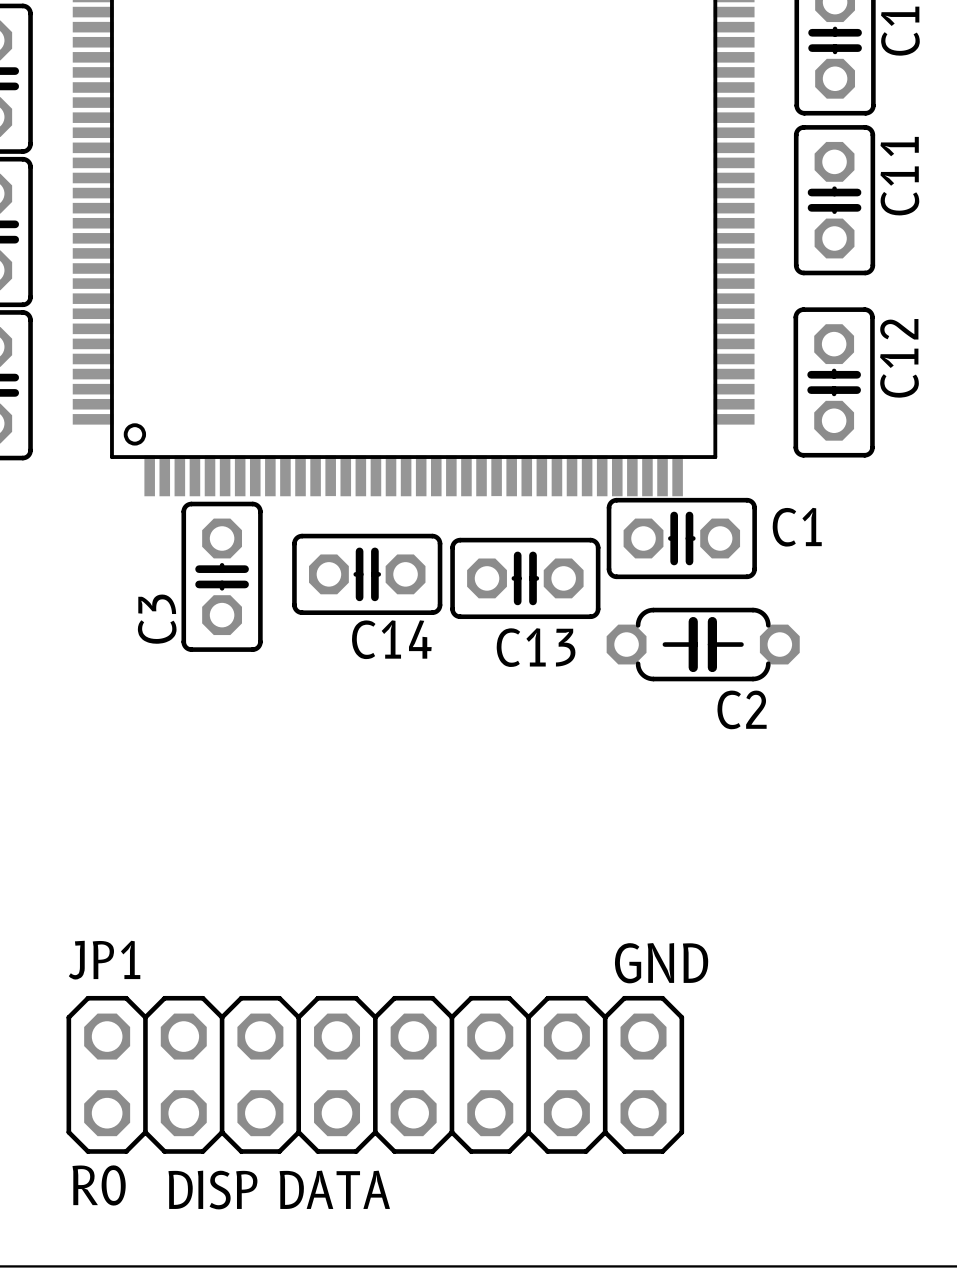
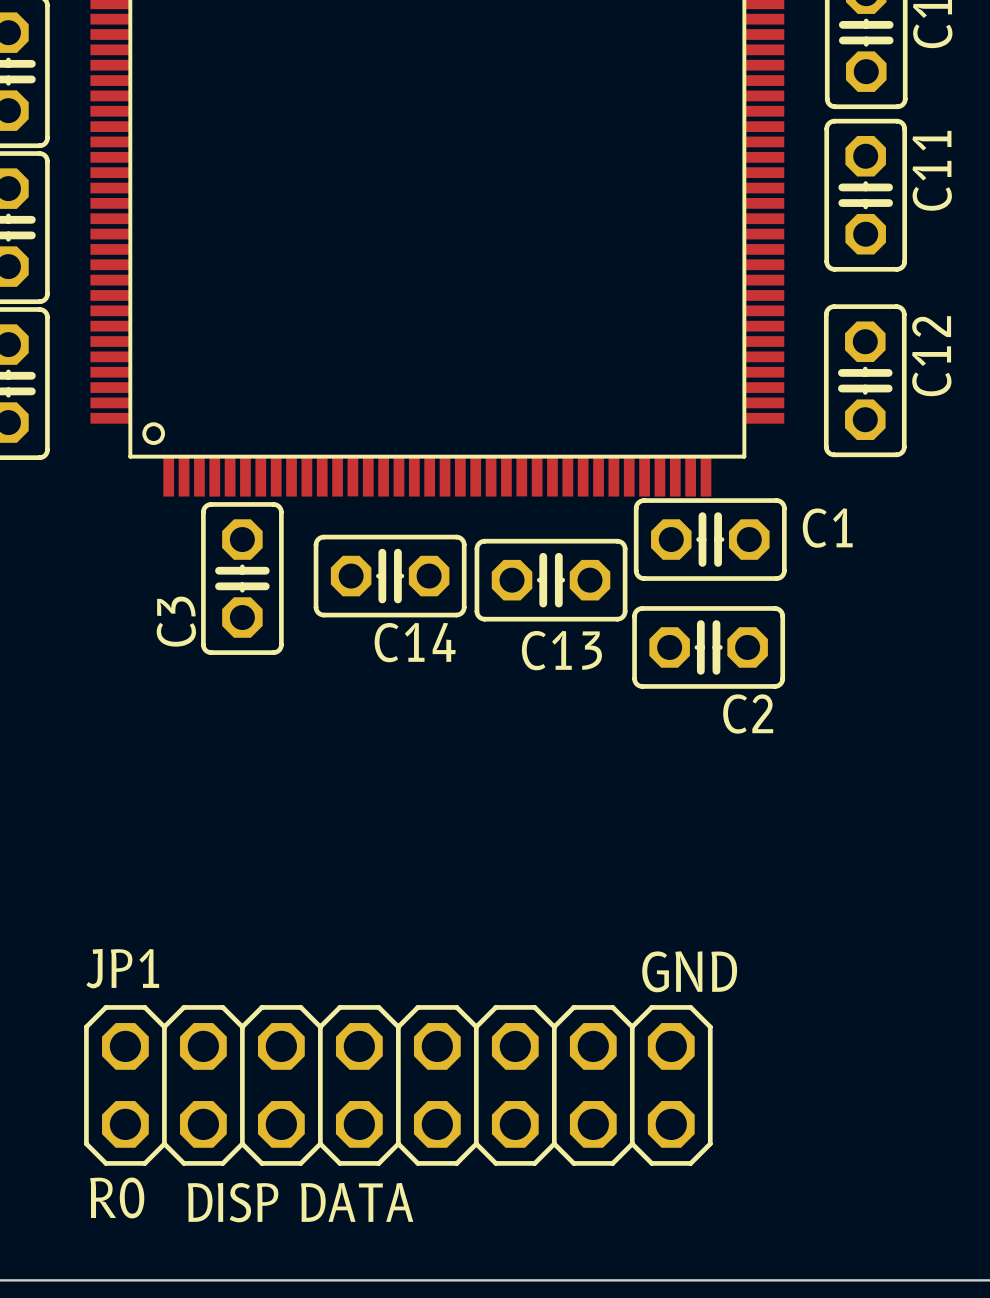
C2 footprint: [606, 607, 800, 682] -> [632, 606, 786, 689]

